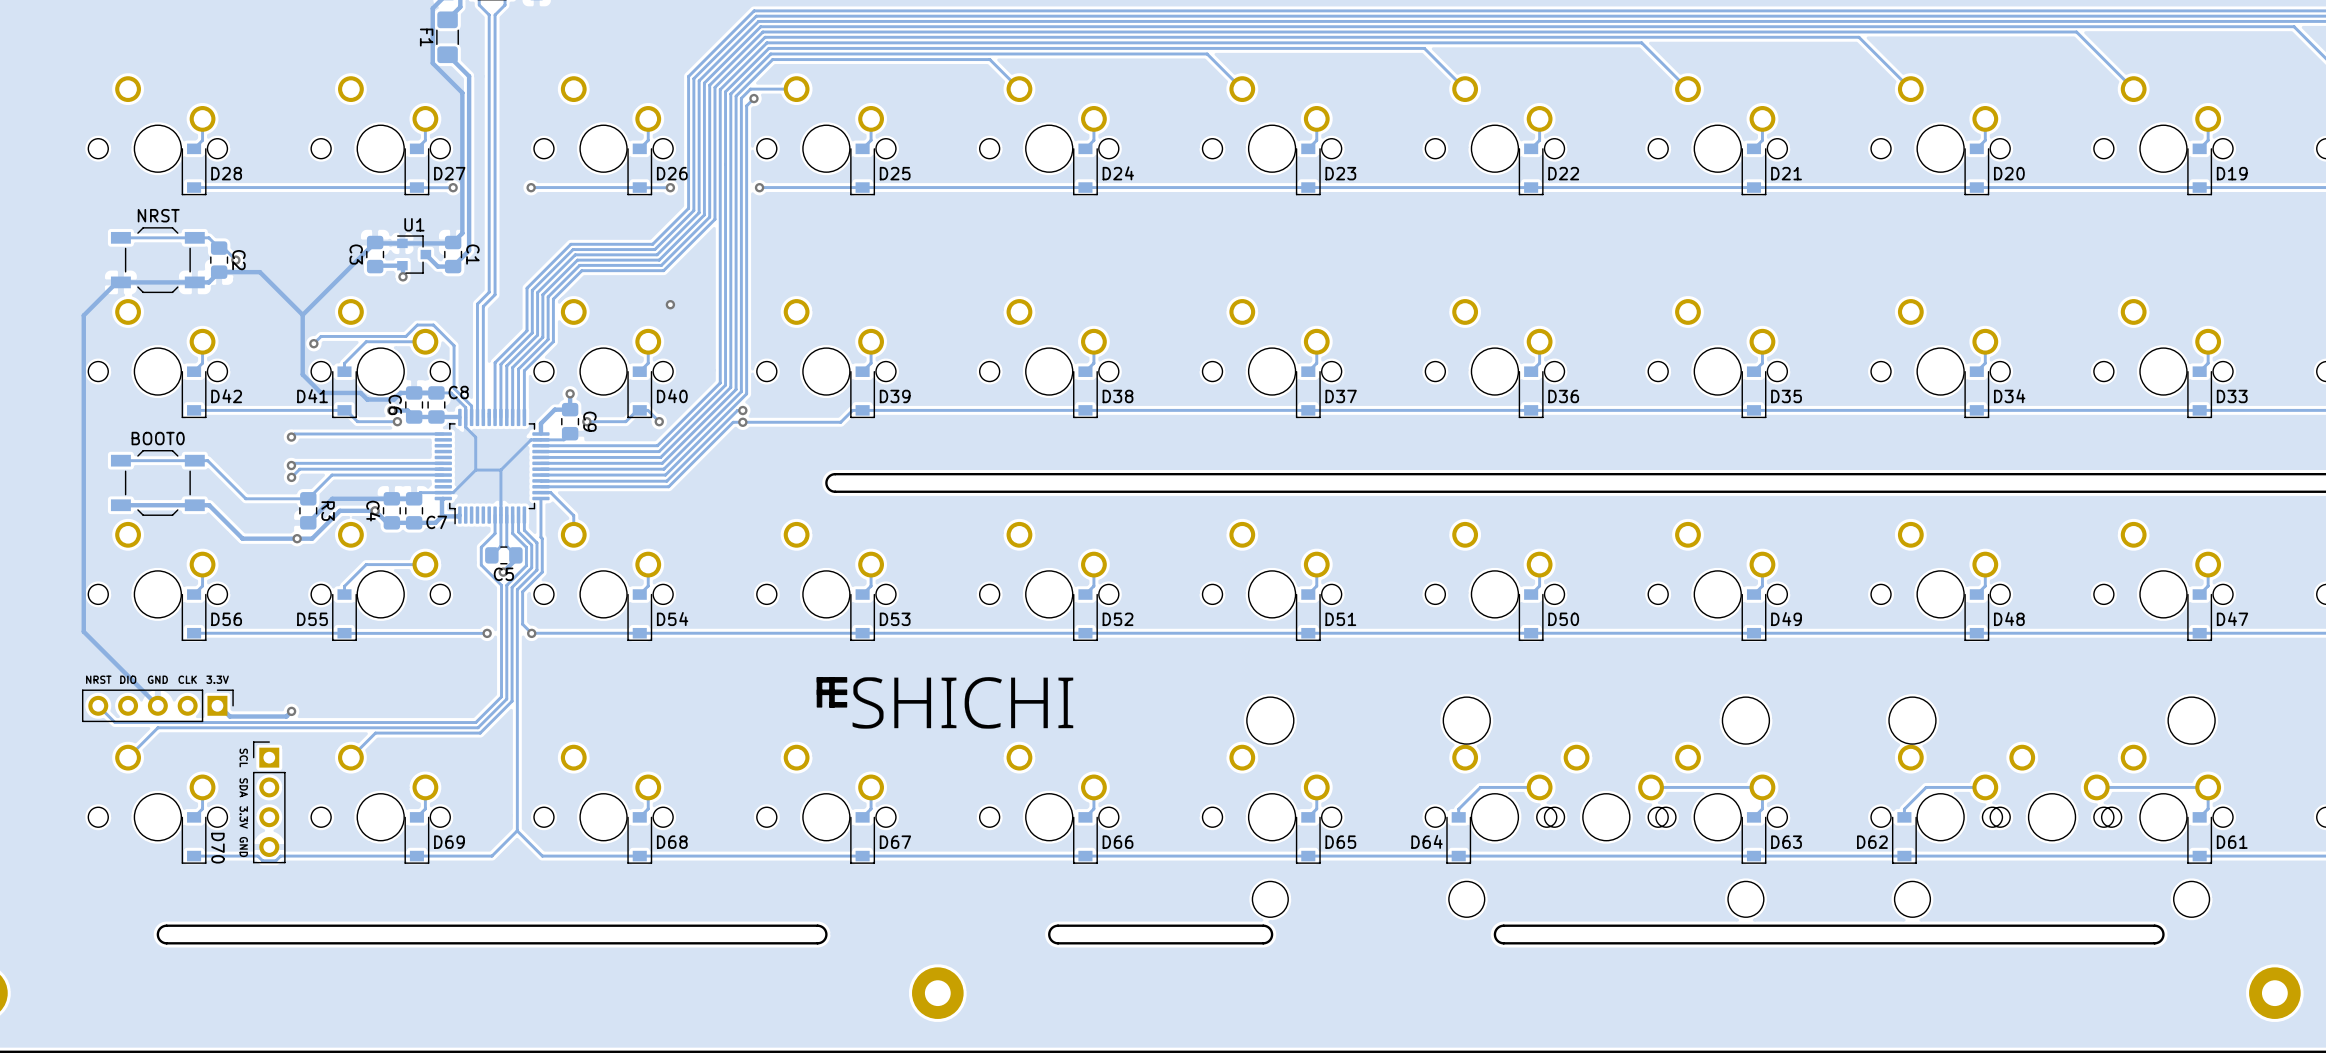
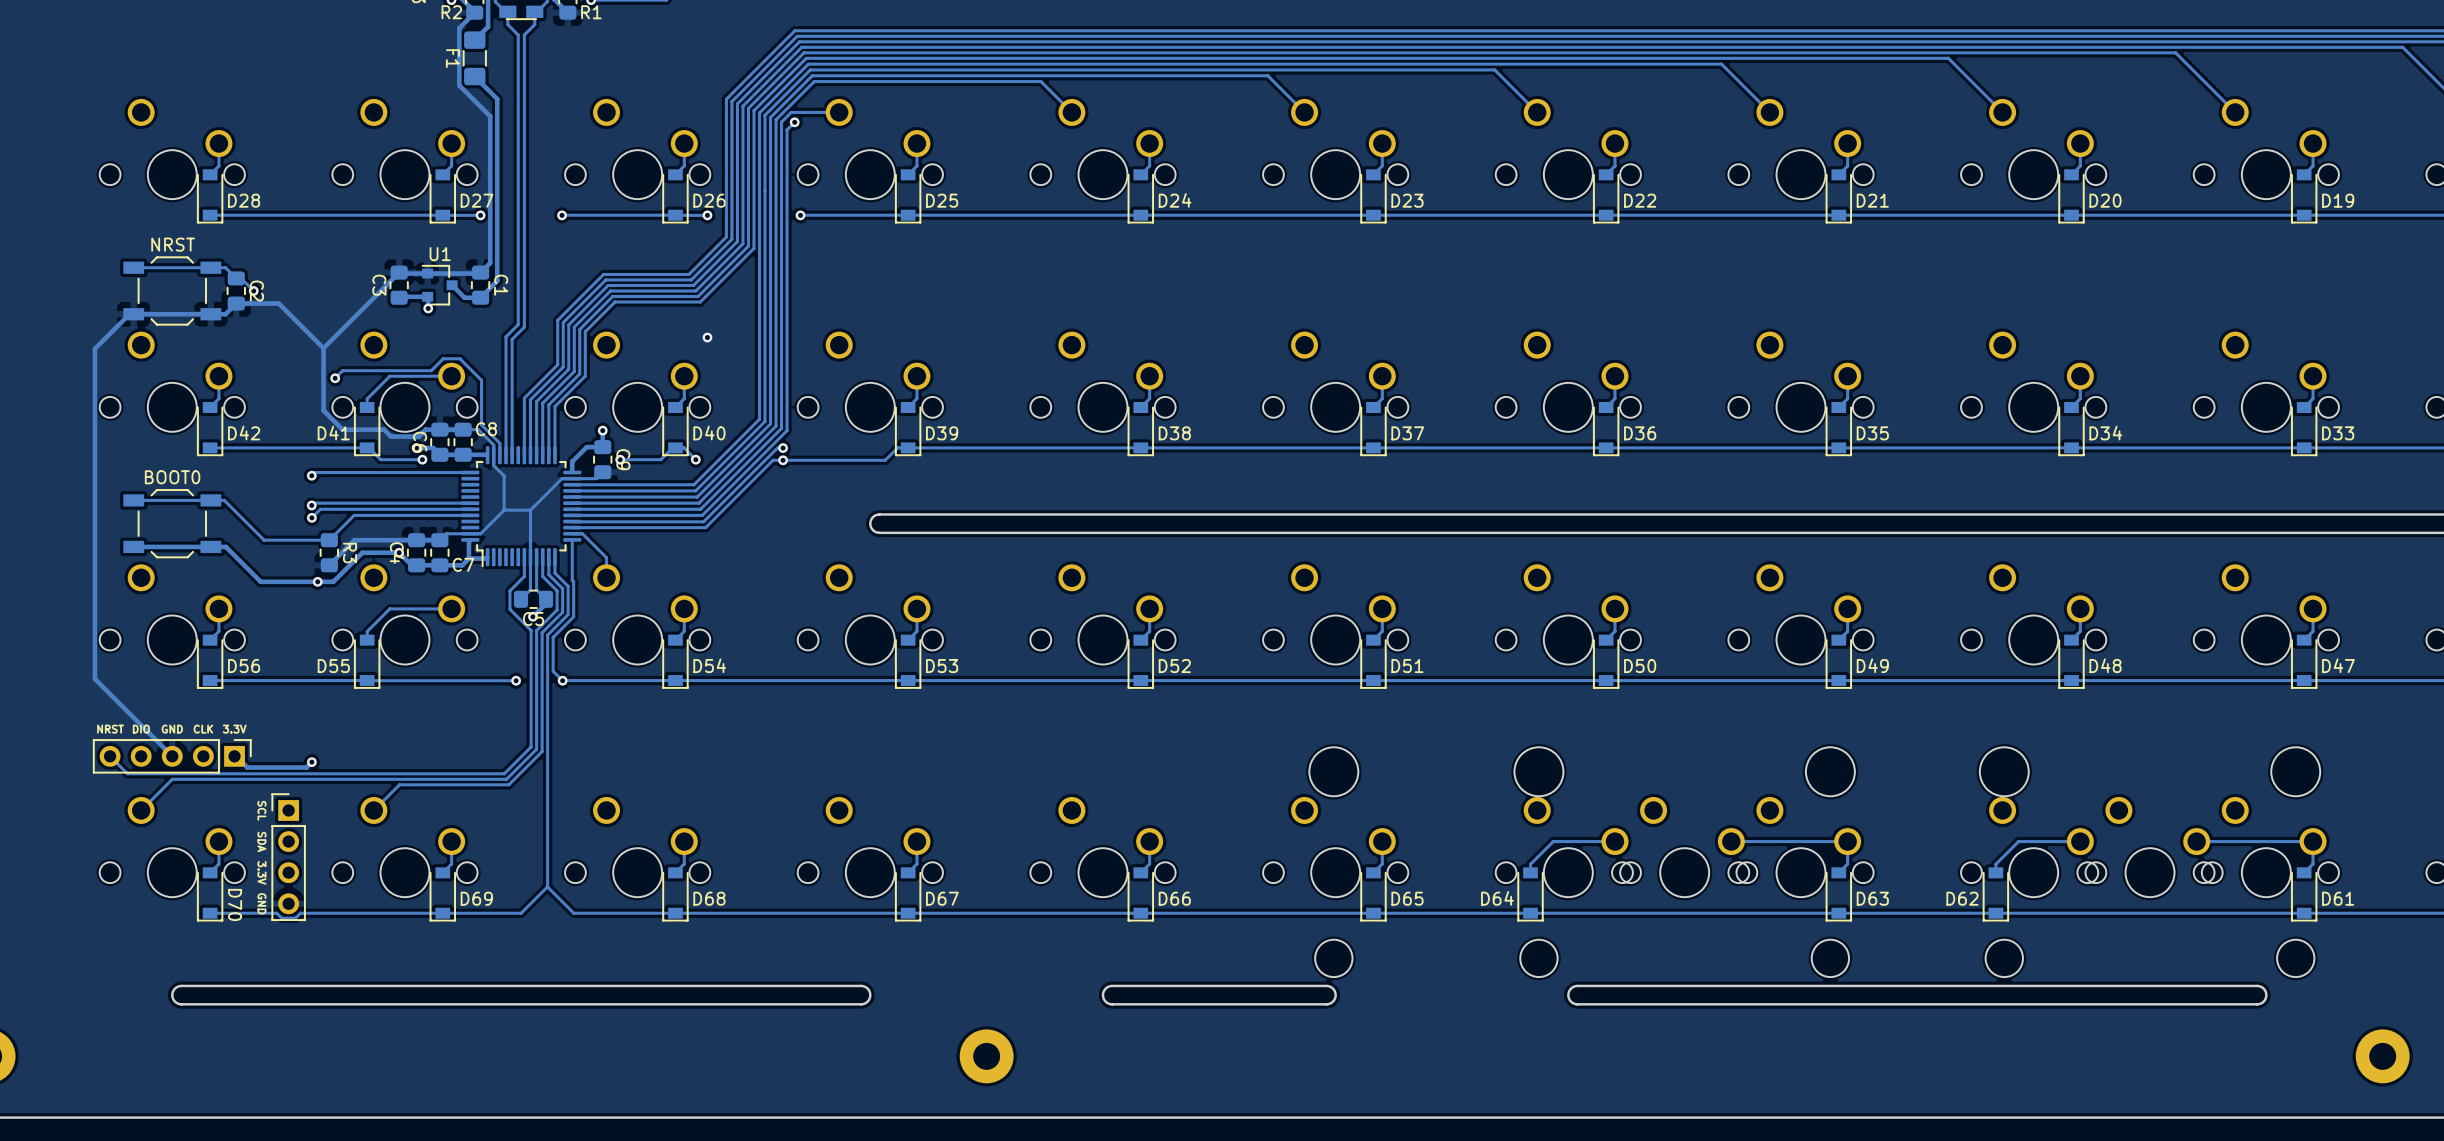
drawing: [816, 677, 1074, 729] -> none

